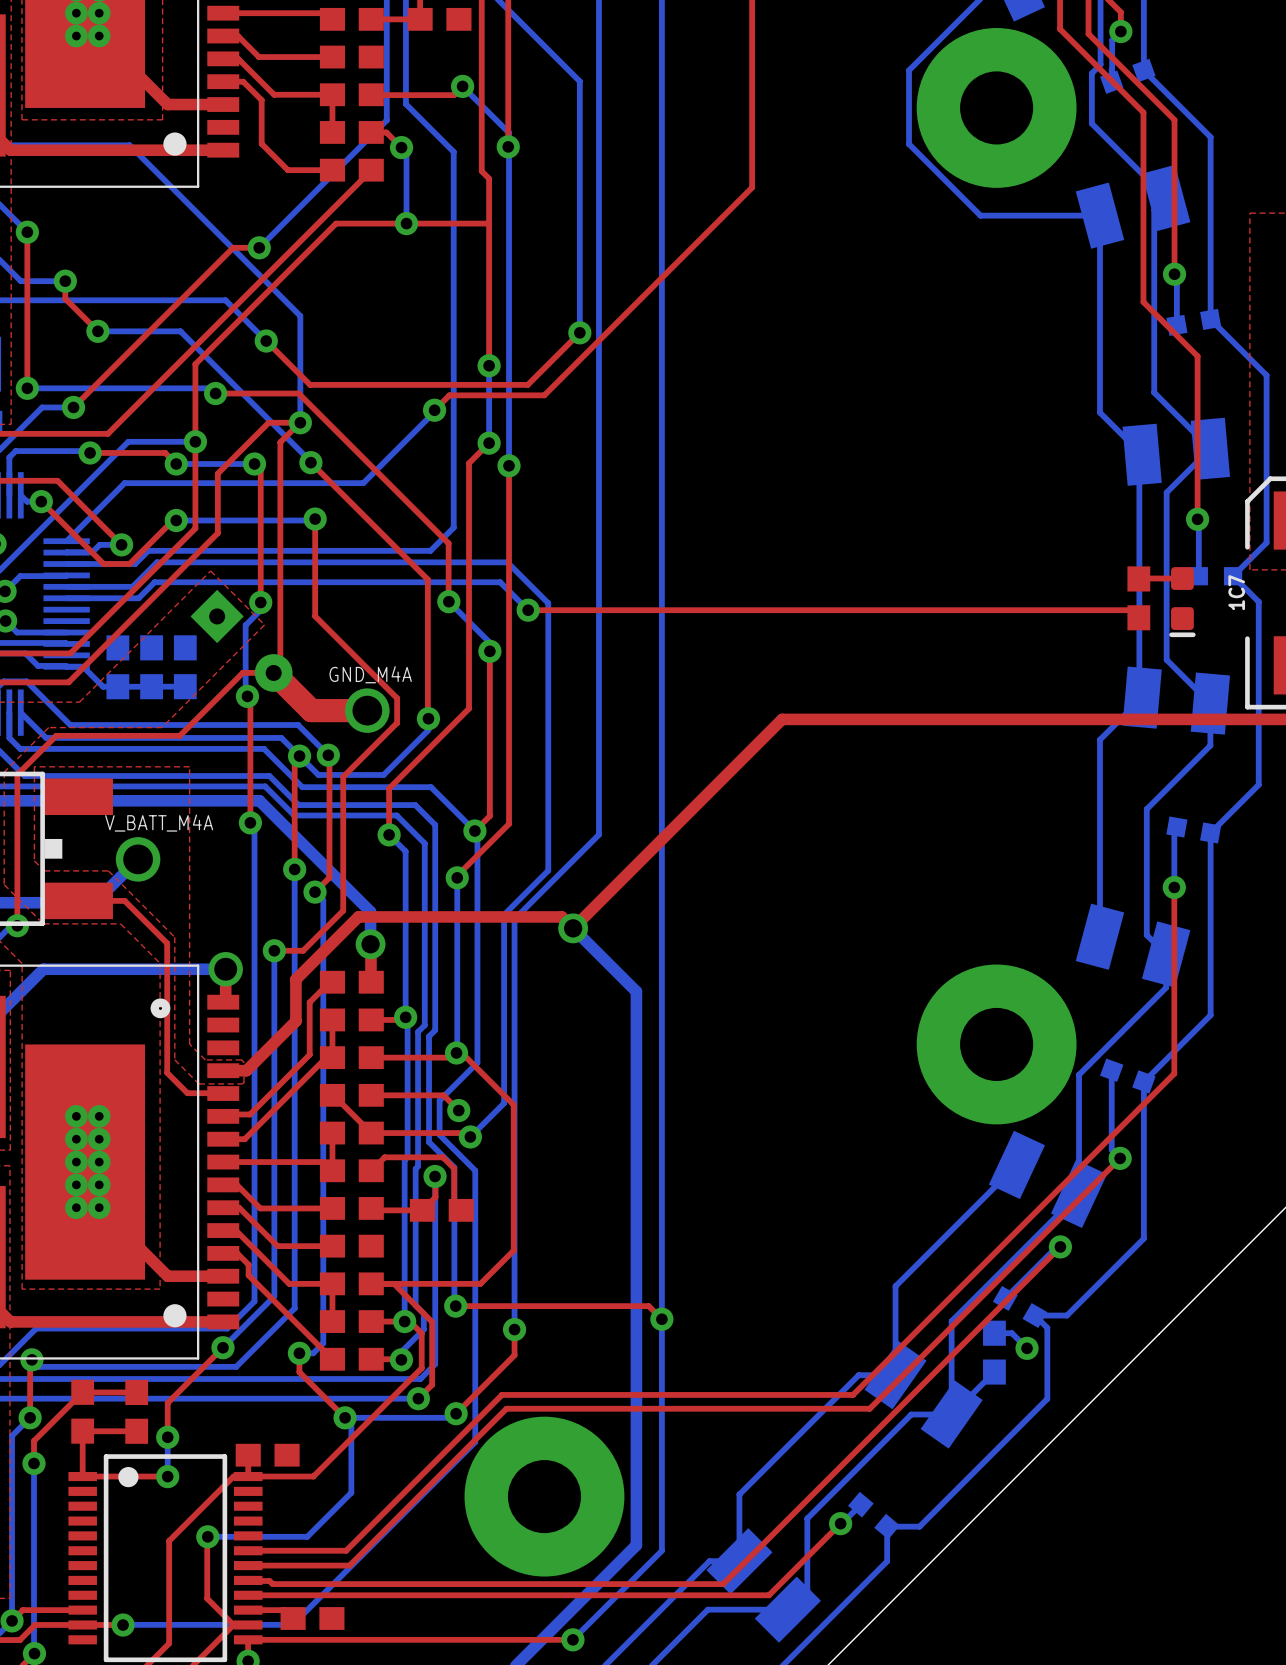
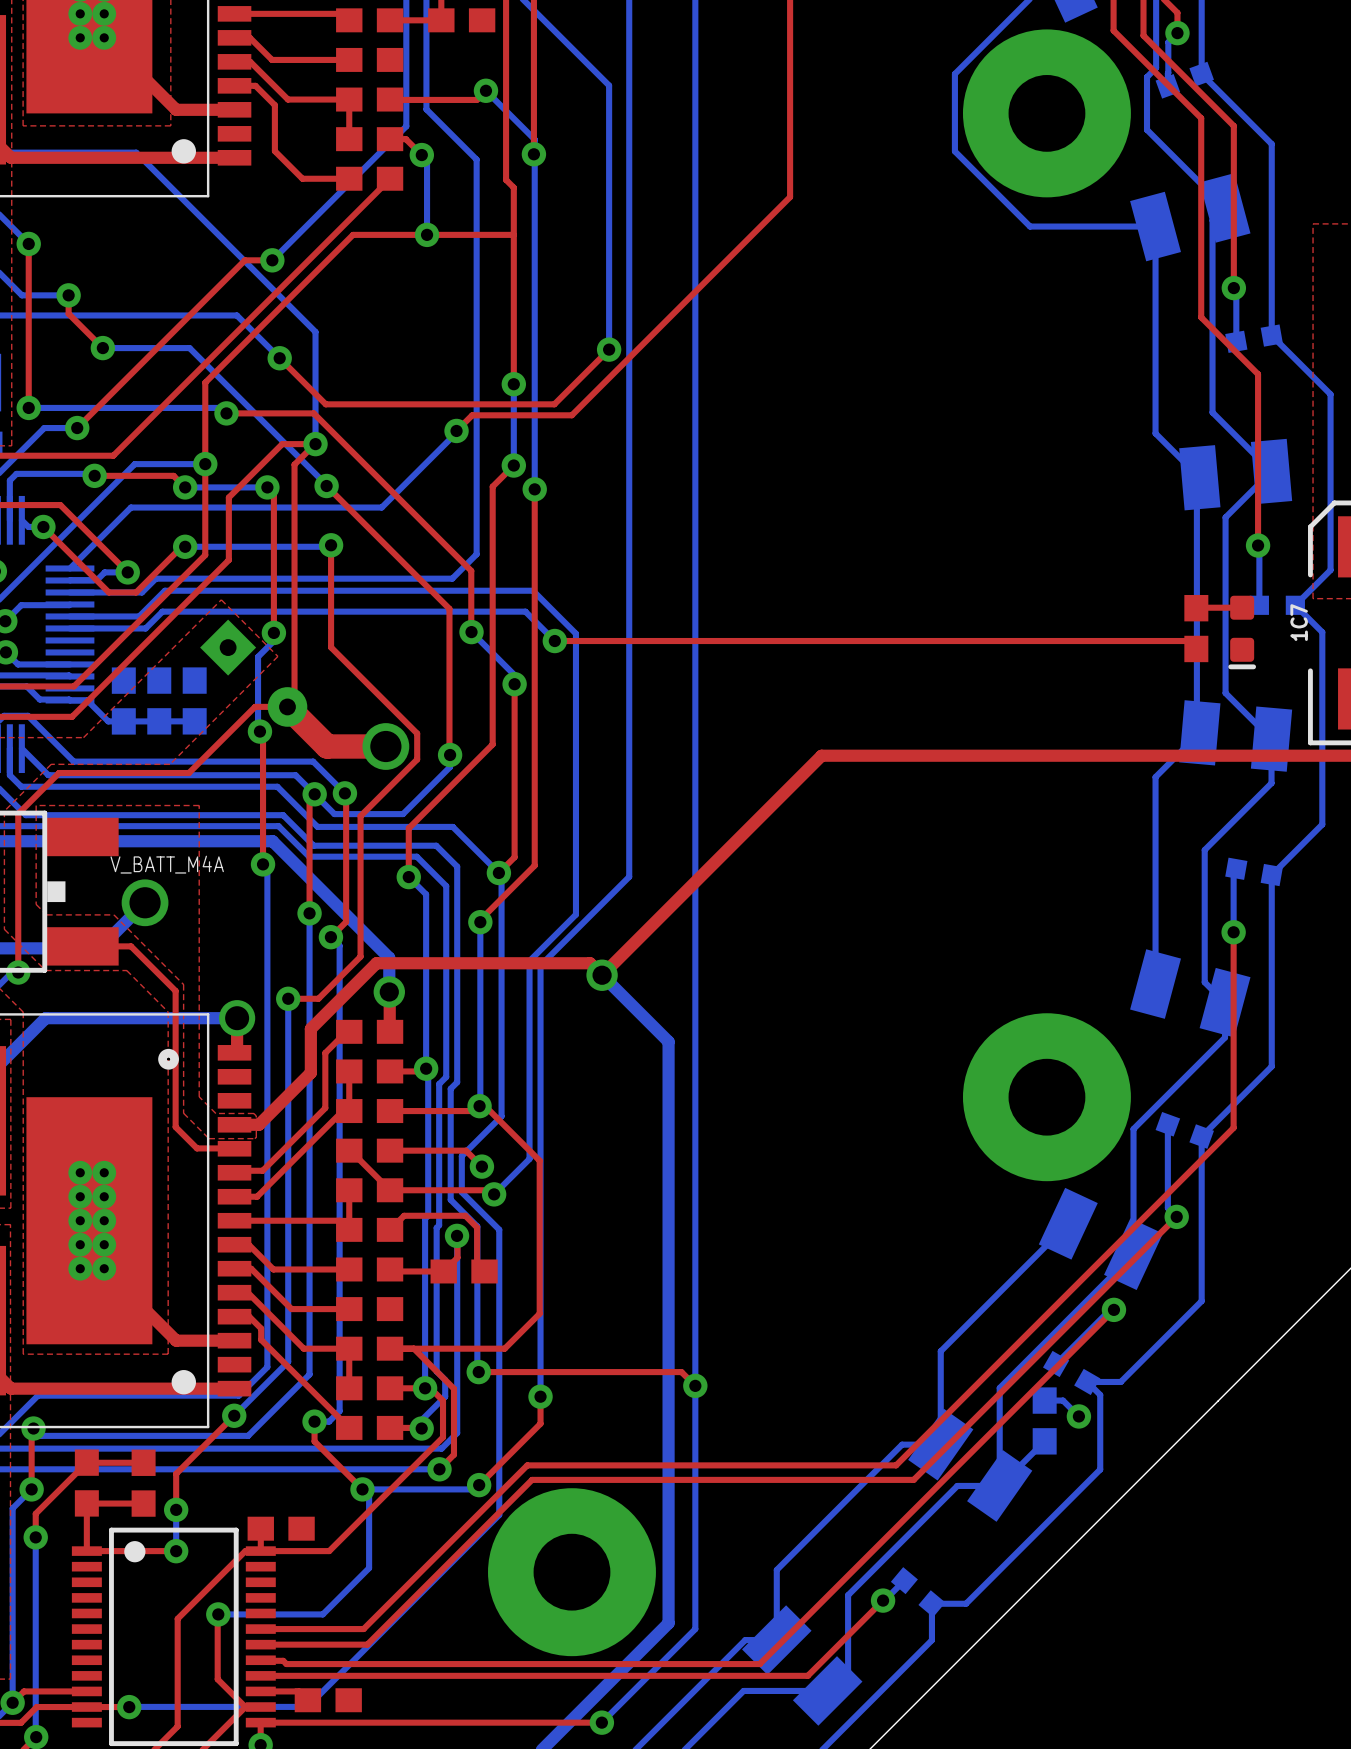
GND_M4A name: GND_M4A (370, 674) -> none

